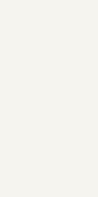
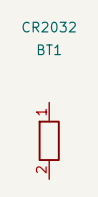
BT1: none -> CR2032 (49, 140)

